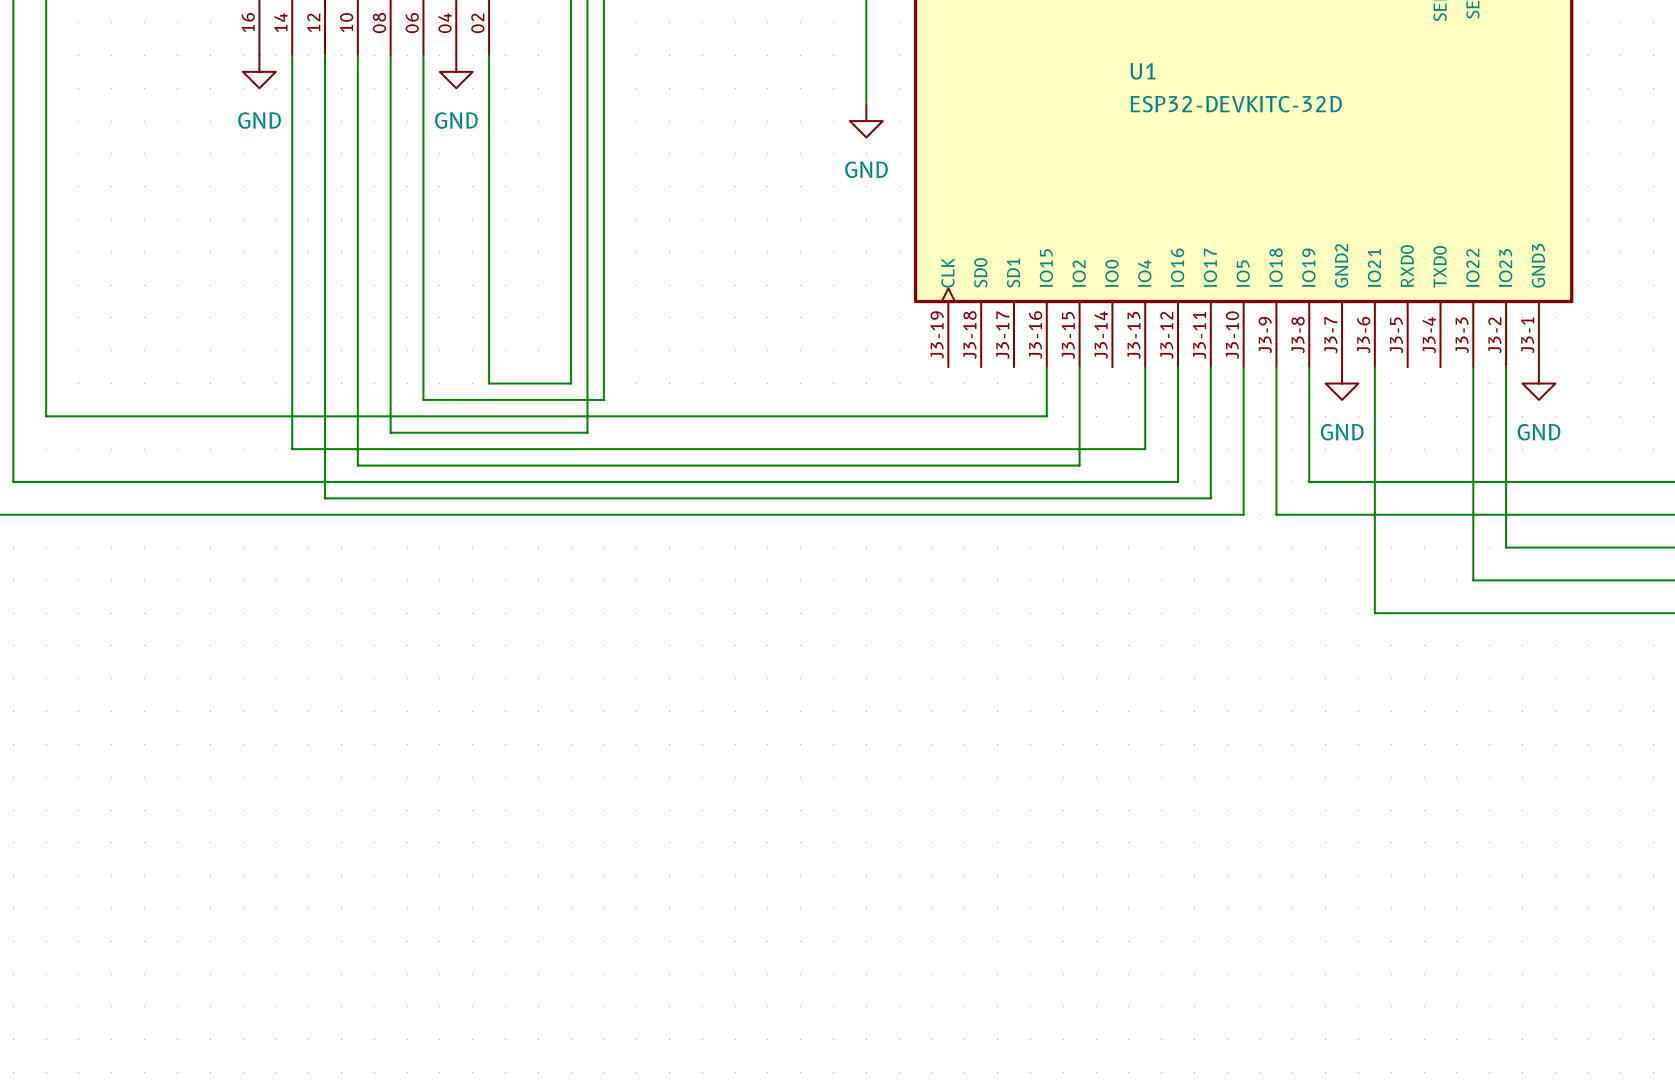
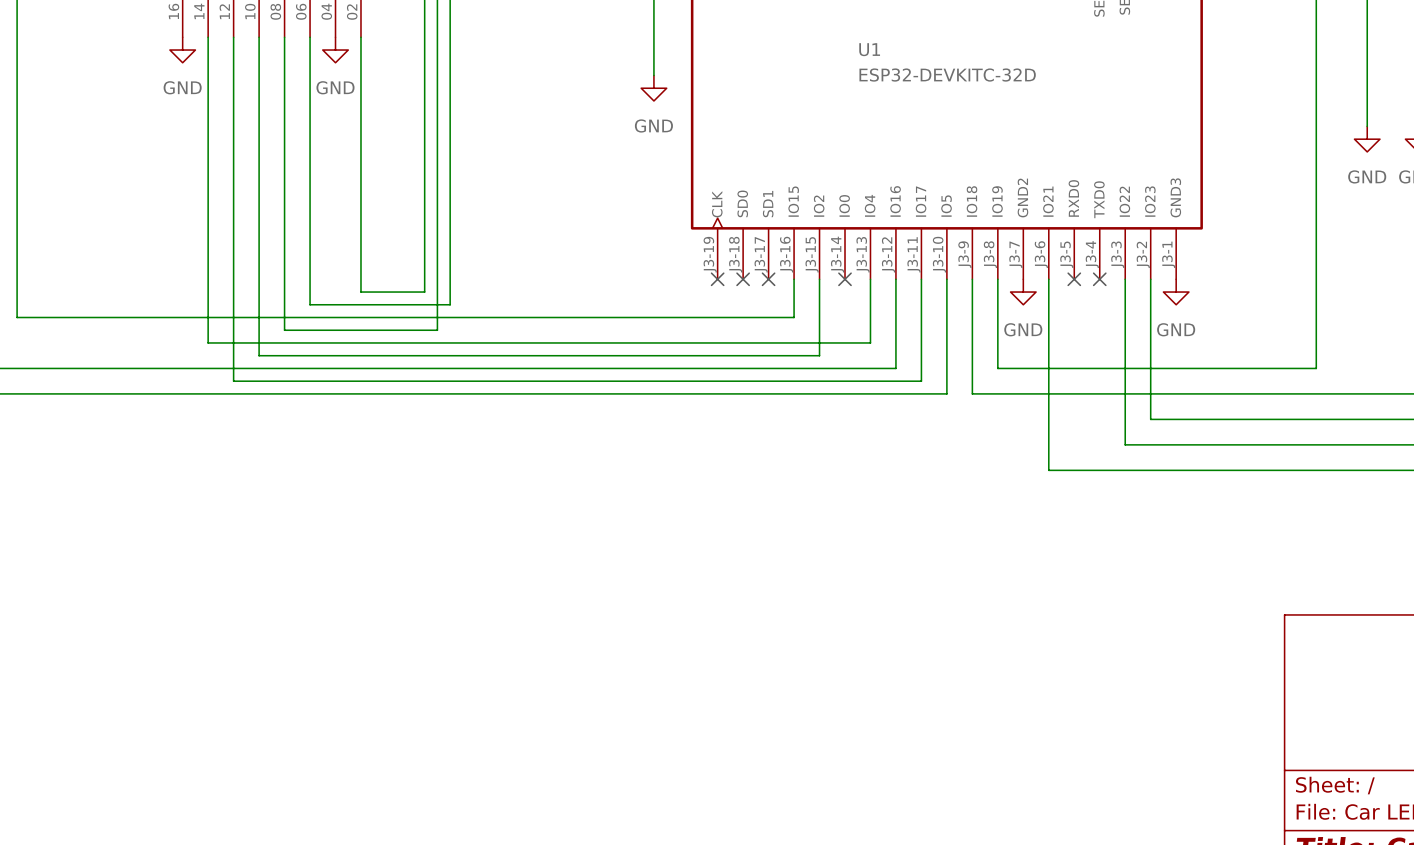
no-connect mark: none -> (717, 279)
no-connect mark: none -> (743, 279)
no-connect mark: none -> (768, 279)
no-connect mark: none -> (845, 279)
no-connect mark: none -> (1074, 279)
no-connect mark: none -> (1099, 279)

